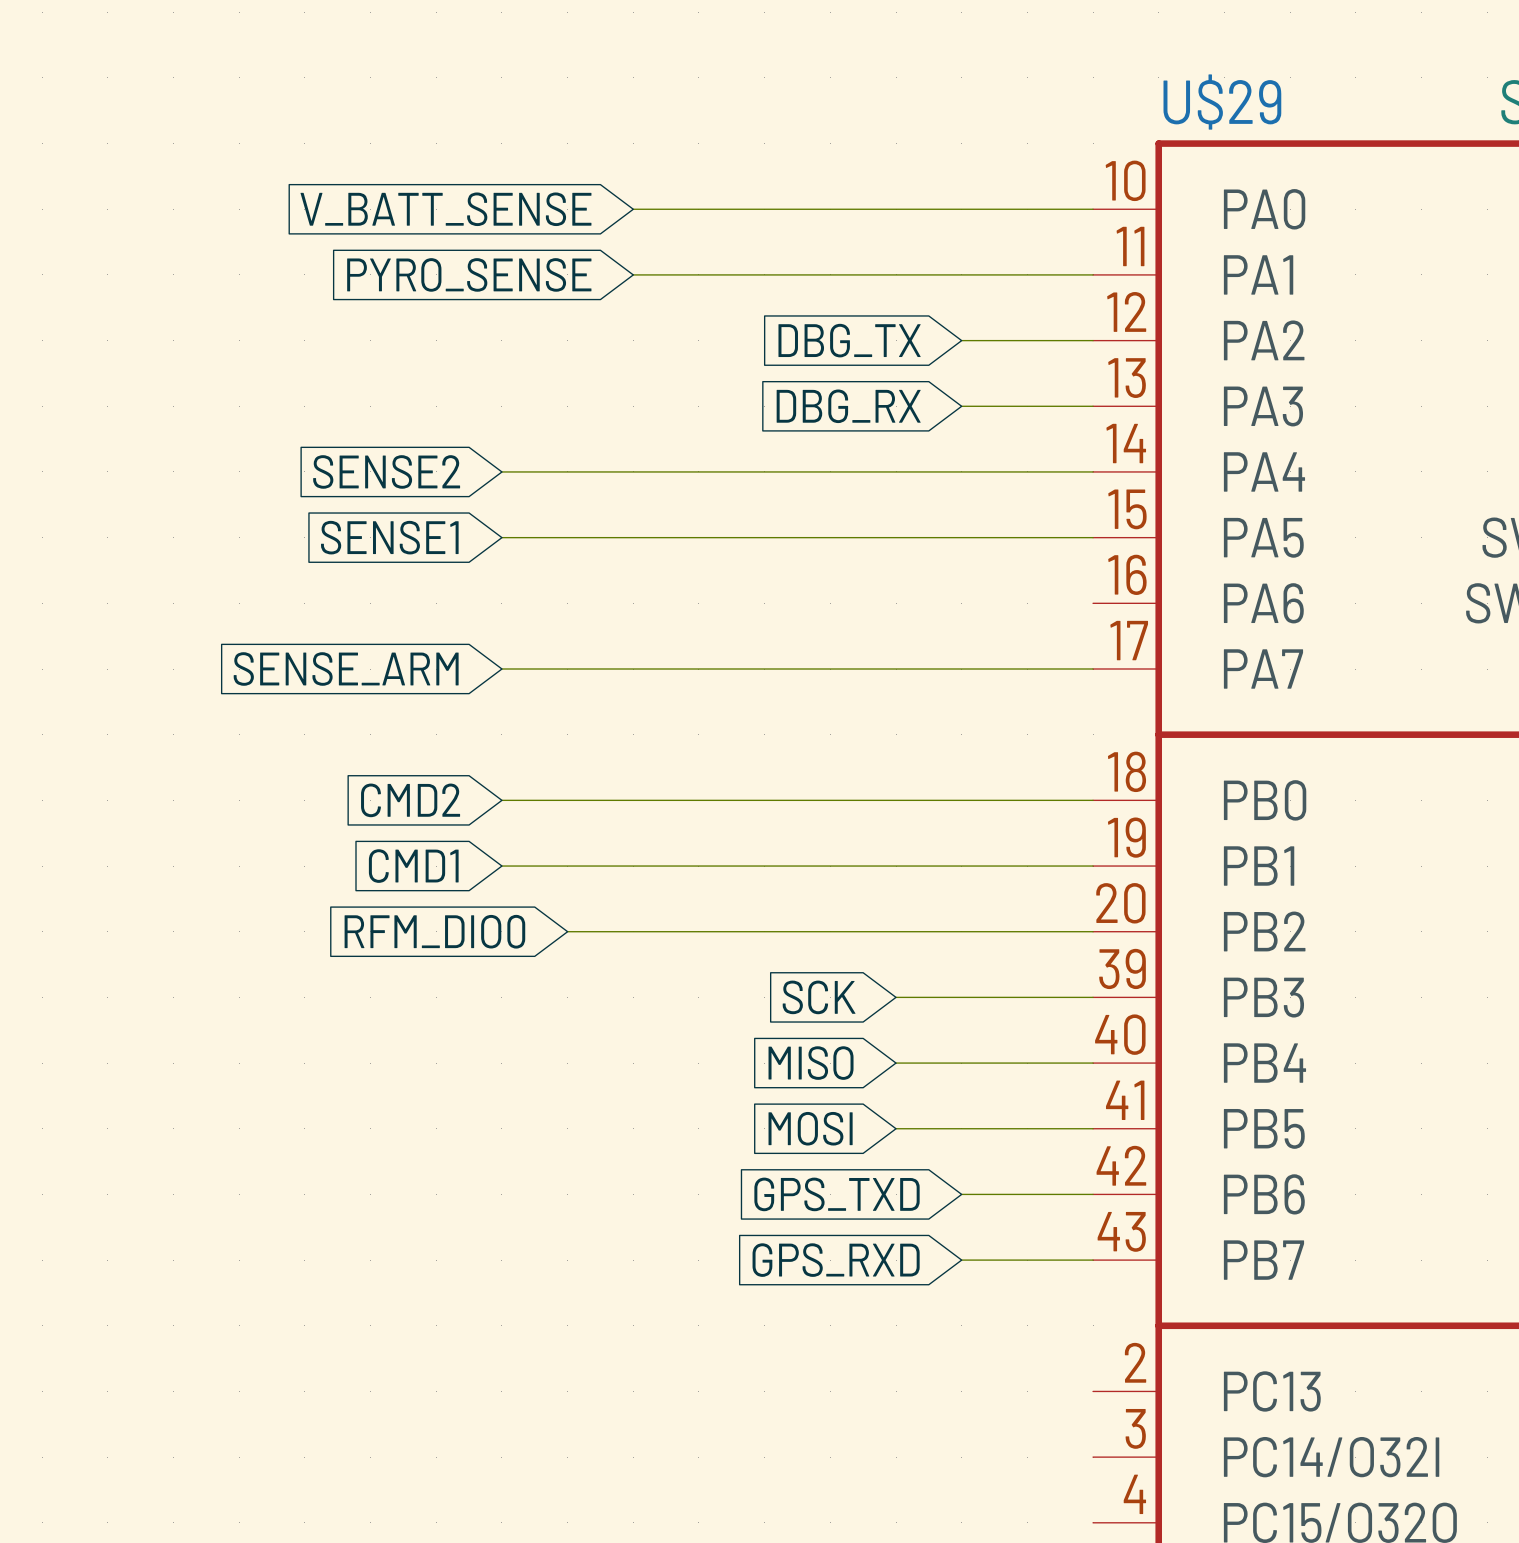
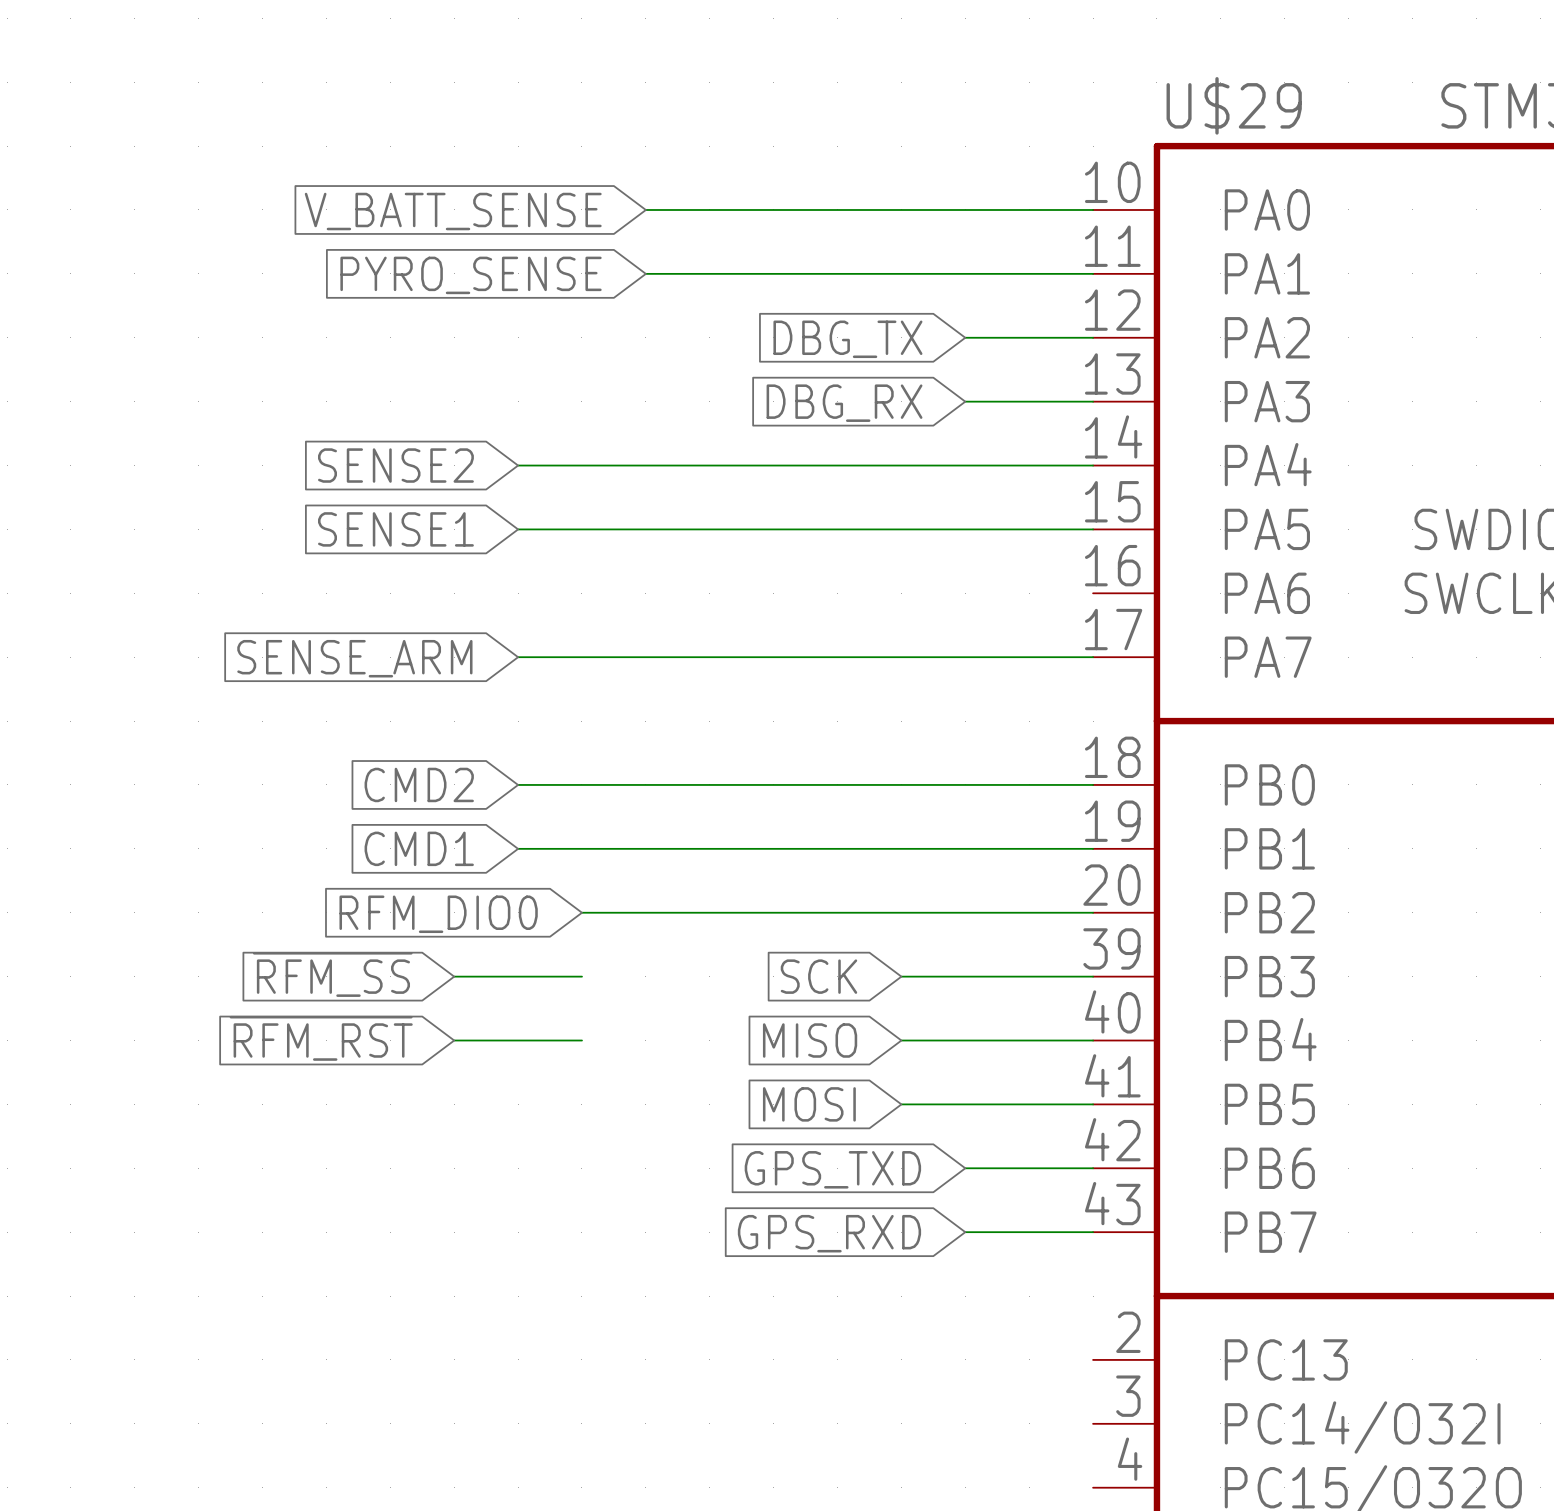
global label: none -> ~{RFM_SS} (332, 974)
wire: none -> (454, 976) (581, 976)
global label: none -> ~{RFM_RST} (321, 1038)
wire: none -> (454, 1040) (581, 1040)

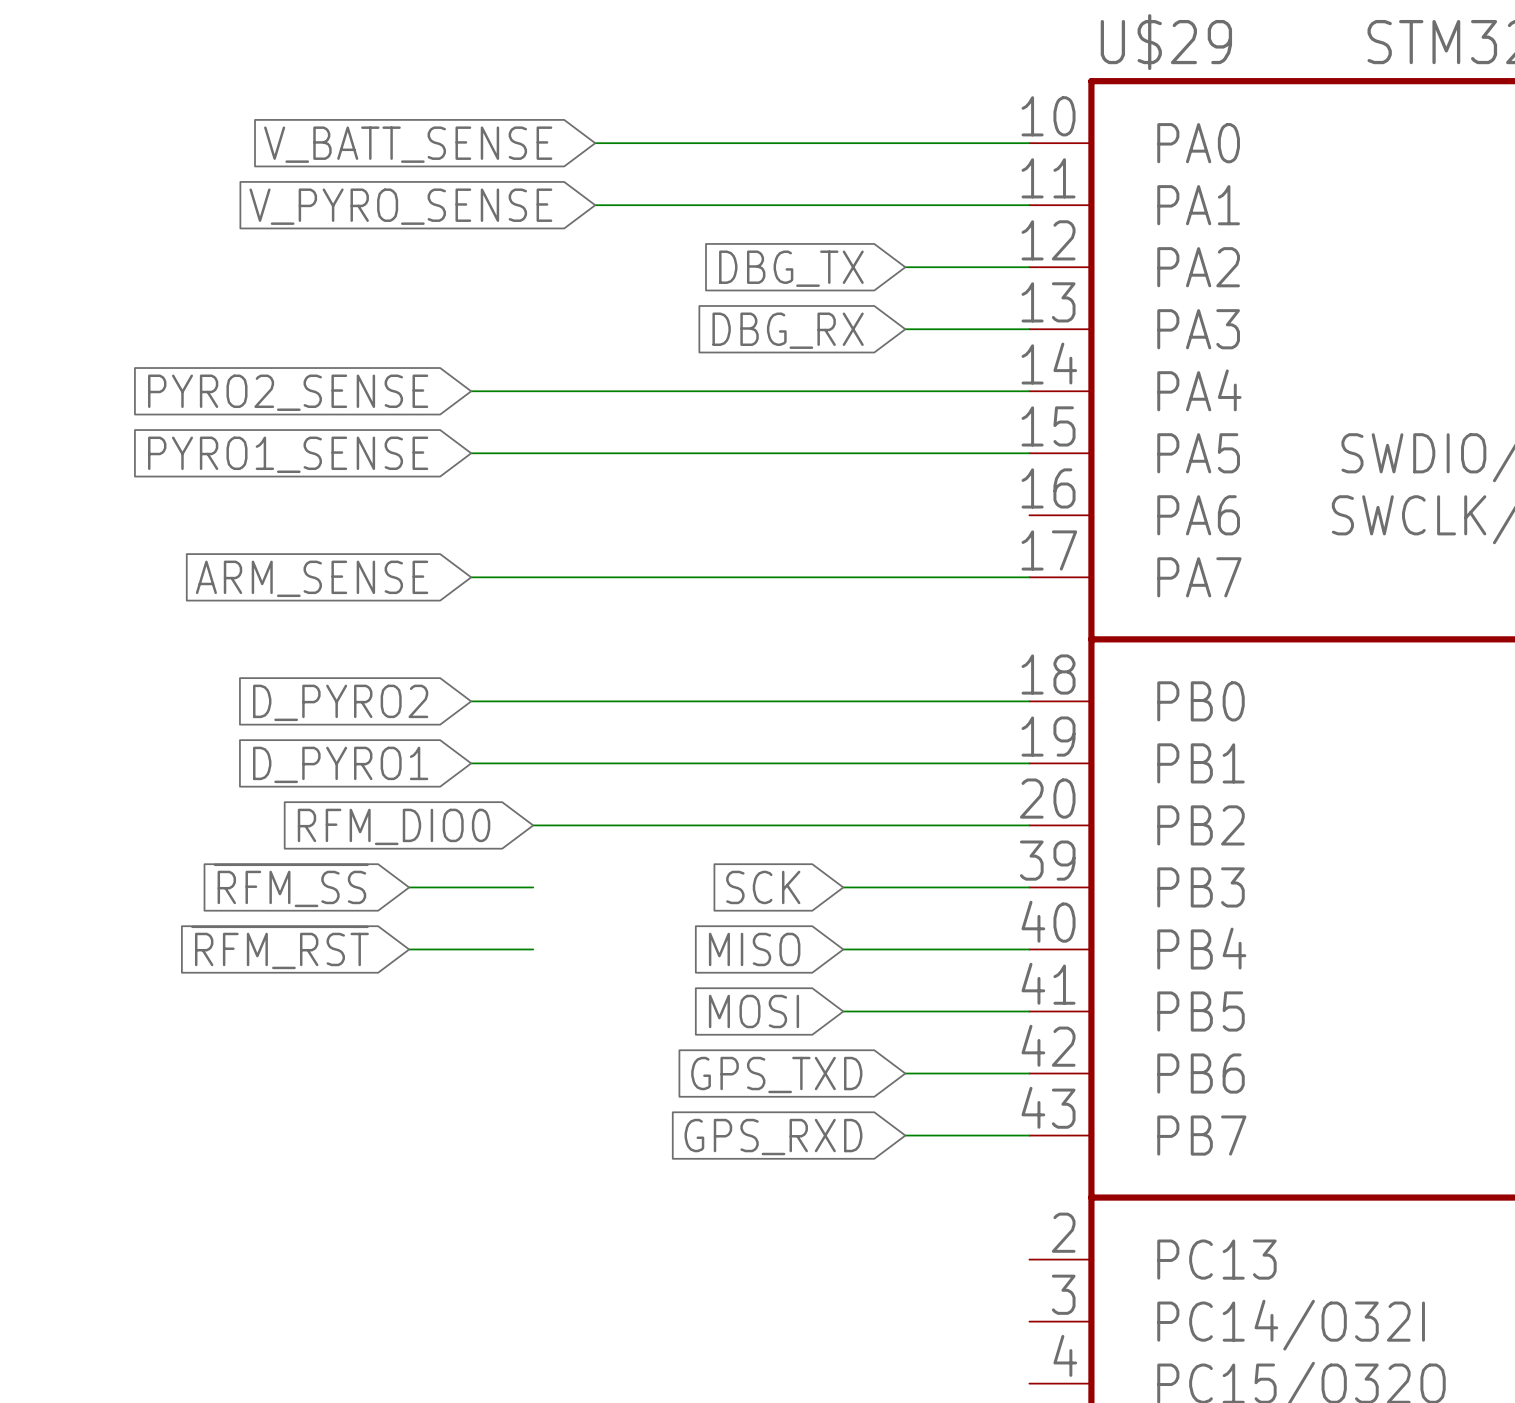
global label: PYRO_SENSE (471, 275) -> V_PYRO_SENSE (400, 206)
global label: SENSE2 (395, 465) -> PYRO2_SENSE (288, 392)
global label: SENSE1 (395, 529) -> PYRO1_SENSE (288, 454)
global label: SENSE_ARM (354, 658) -> ARM_SENSE (312, 578)
global label: CMD2 (419, 784) -> D_PYRO2 (340, 702)
global label: CMD1 (419, 848) -> D_PYRO1 (340, 764)

